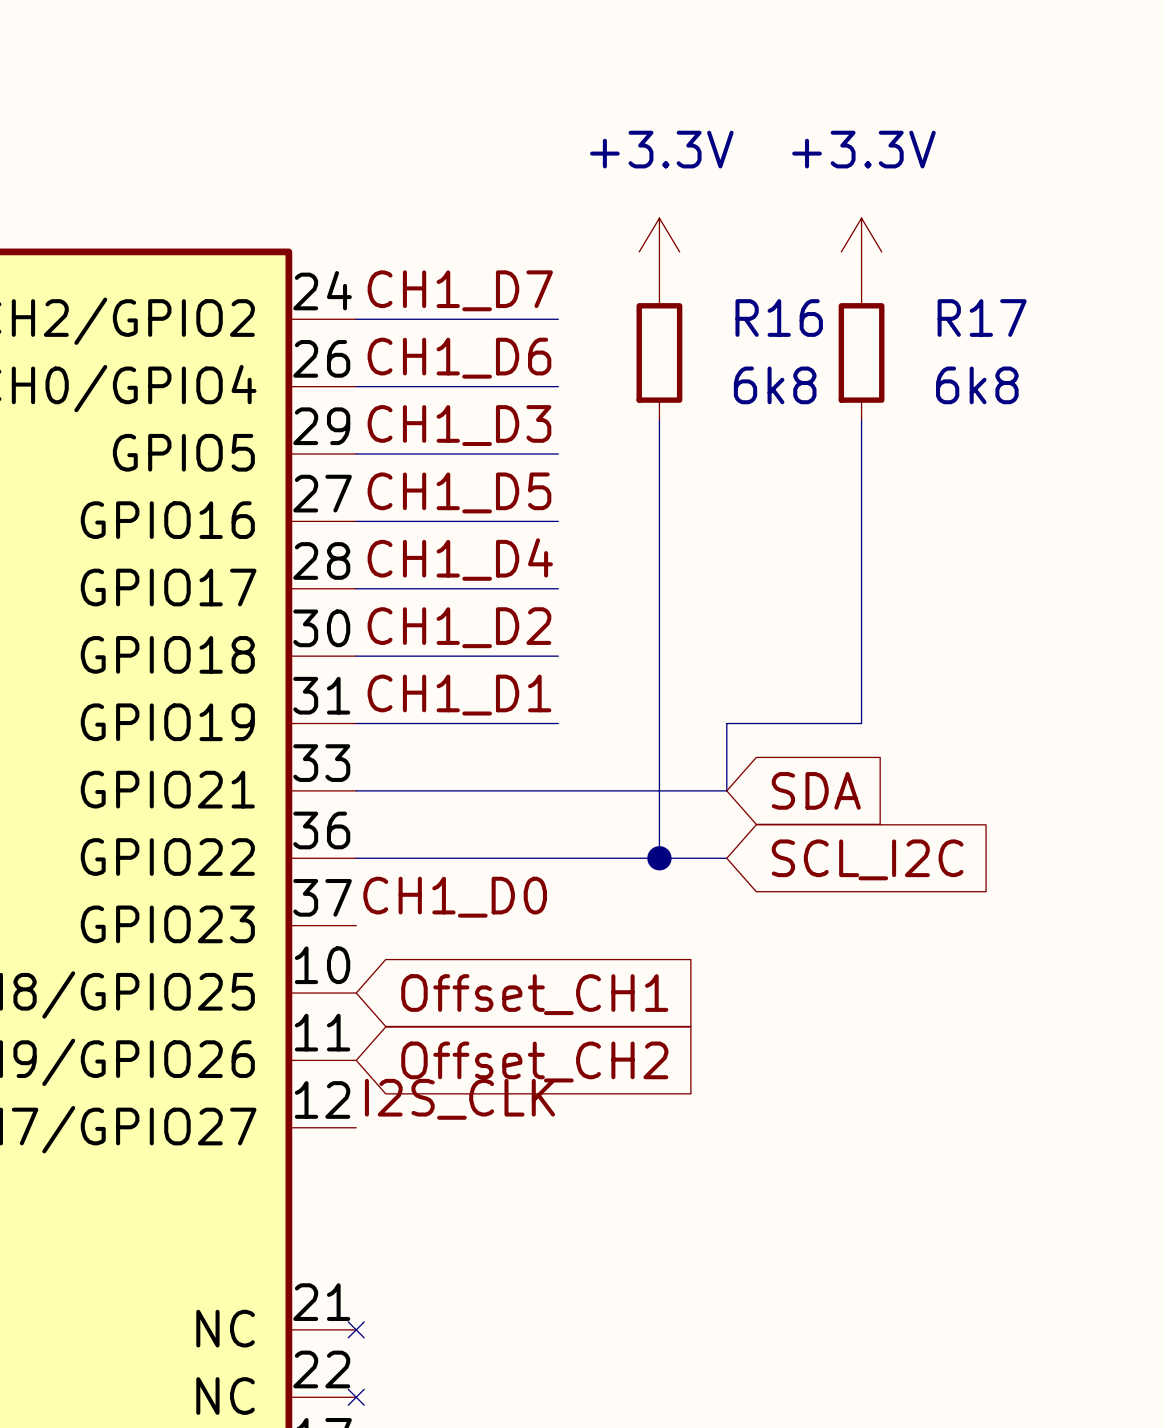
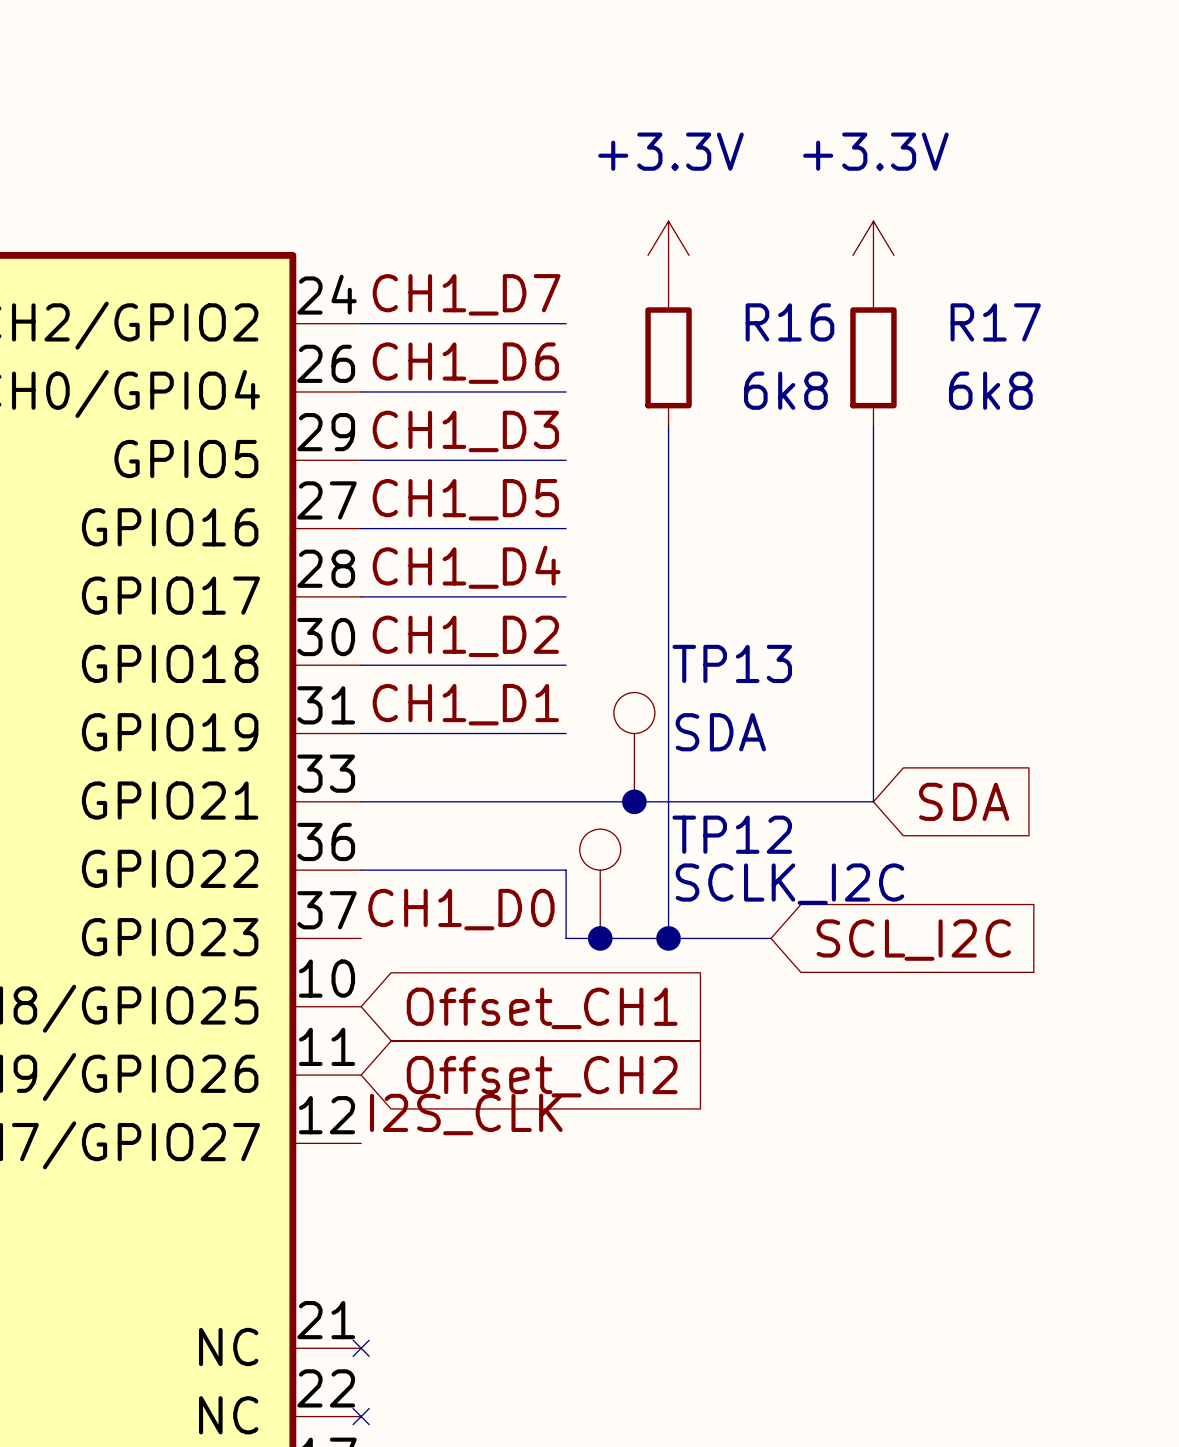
wire: (861, 723) (726, 723) (726, 790) -> (873, 733) (873, 801) (736, 801)
TP13: none -> SDA (634, 747)
junction: none -> (634, 801)
global label position: SDA (816, 790) -> SDA (964, 801)
wire: (558, 858) (726, 858) -> (566, 870) (566, 938) (771, 938)
wire: none -> (668, 870) (668, 938)
junction: (659, 858) -> none
global label position: SCL_I2C (867, 859) -> SCL_I2C (913, 940)
TP12: none -> SCLK_I2C (600, 883)
junction: none -> (600, 938)
junction: none -> (668, 938)

